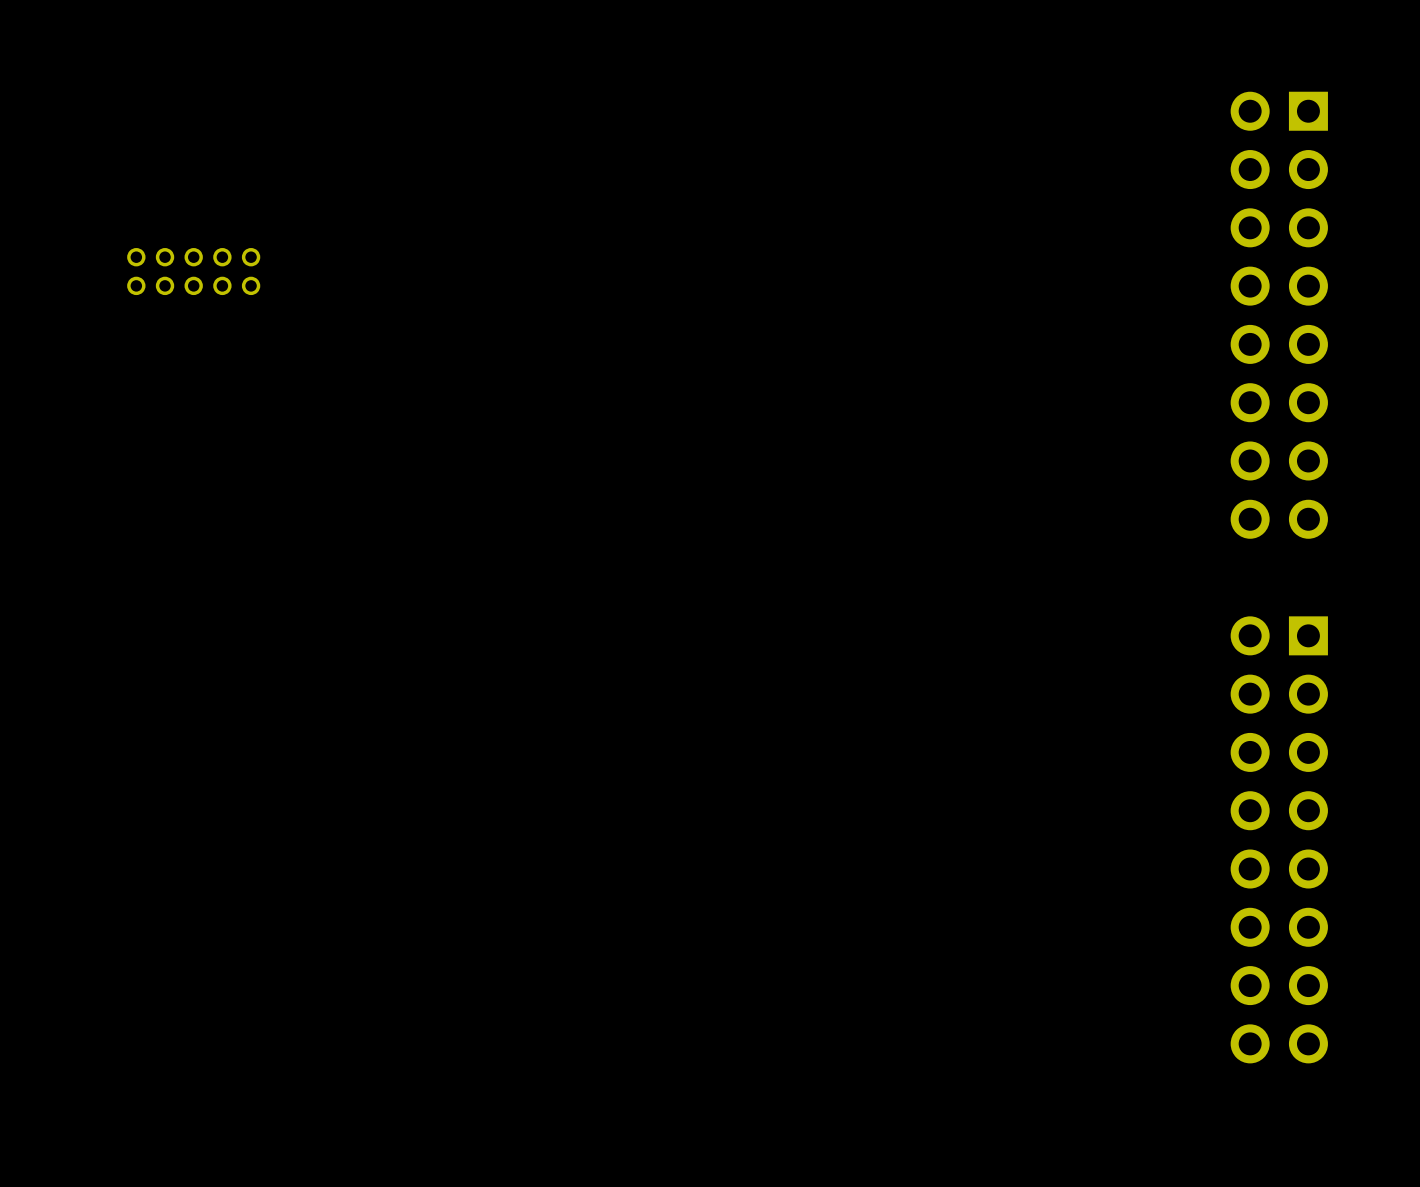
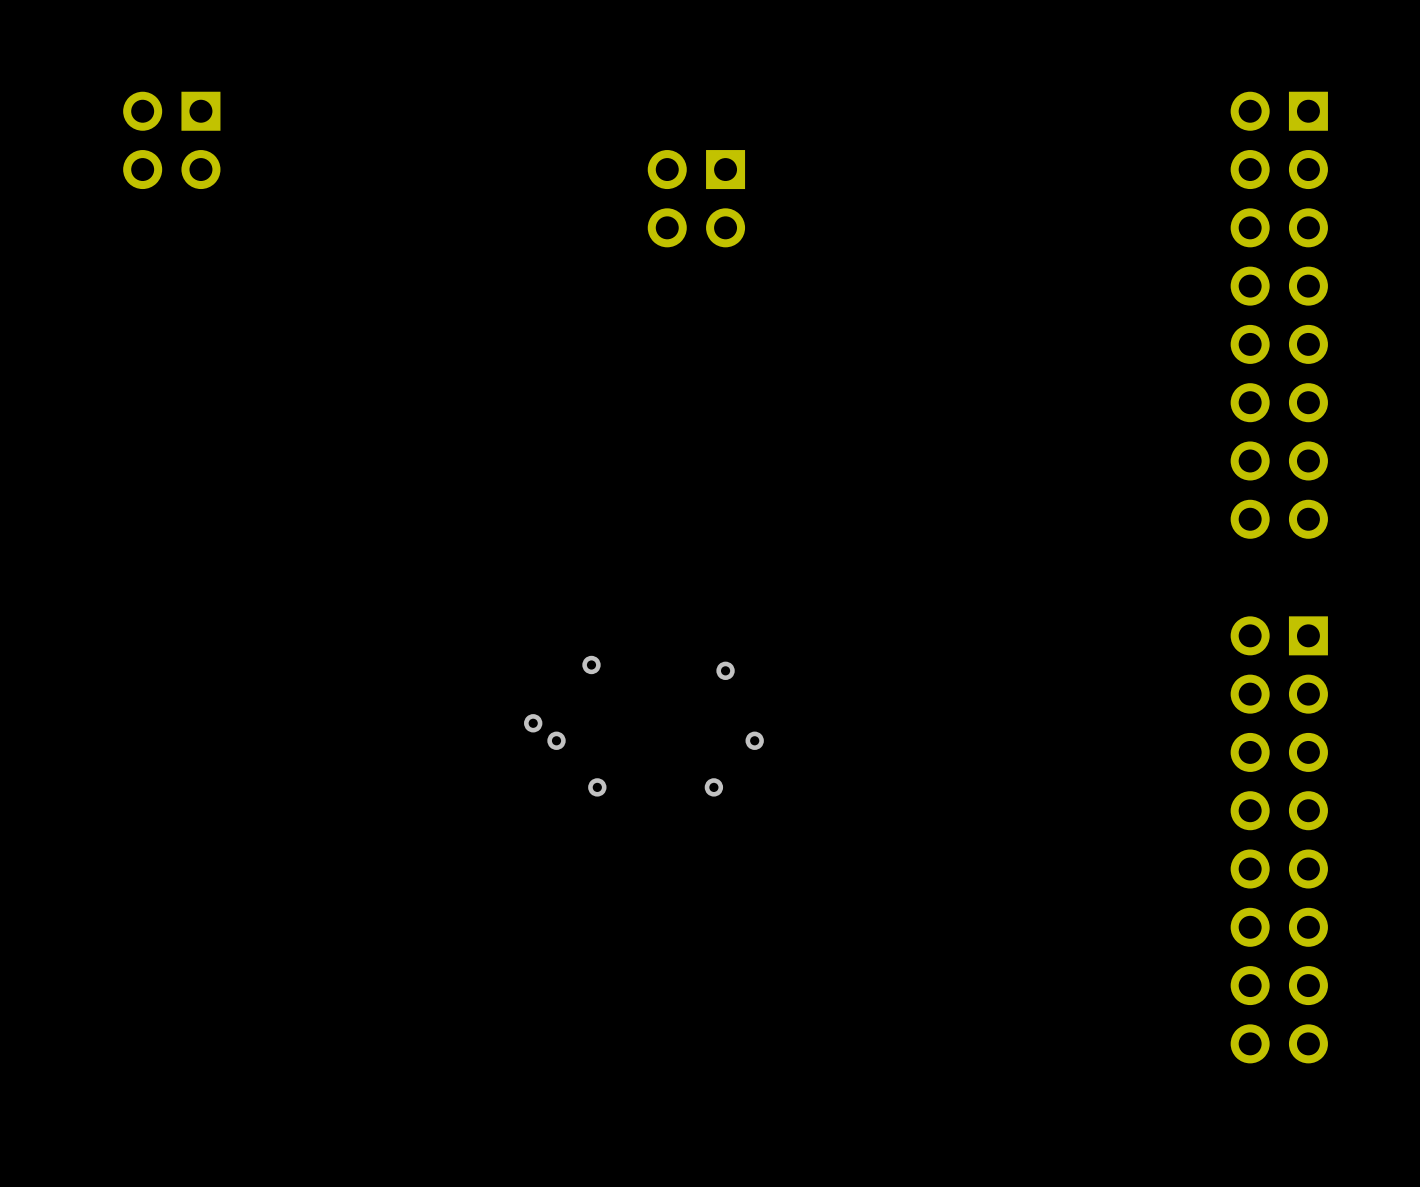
part: none -> (171, 140)
part: none -> (696, 198)
part: (193, 271) -> none
via: none -> (591, 664)
via: none -> (725, 670)
via: none -> (533, 723)
via: none -> (556, 740)
via: none -> (754, 740)
via: none -> (597, 787)
via: none -> (713, 787)

